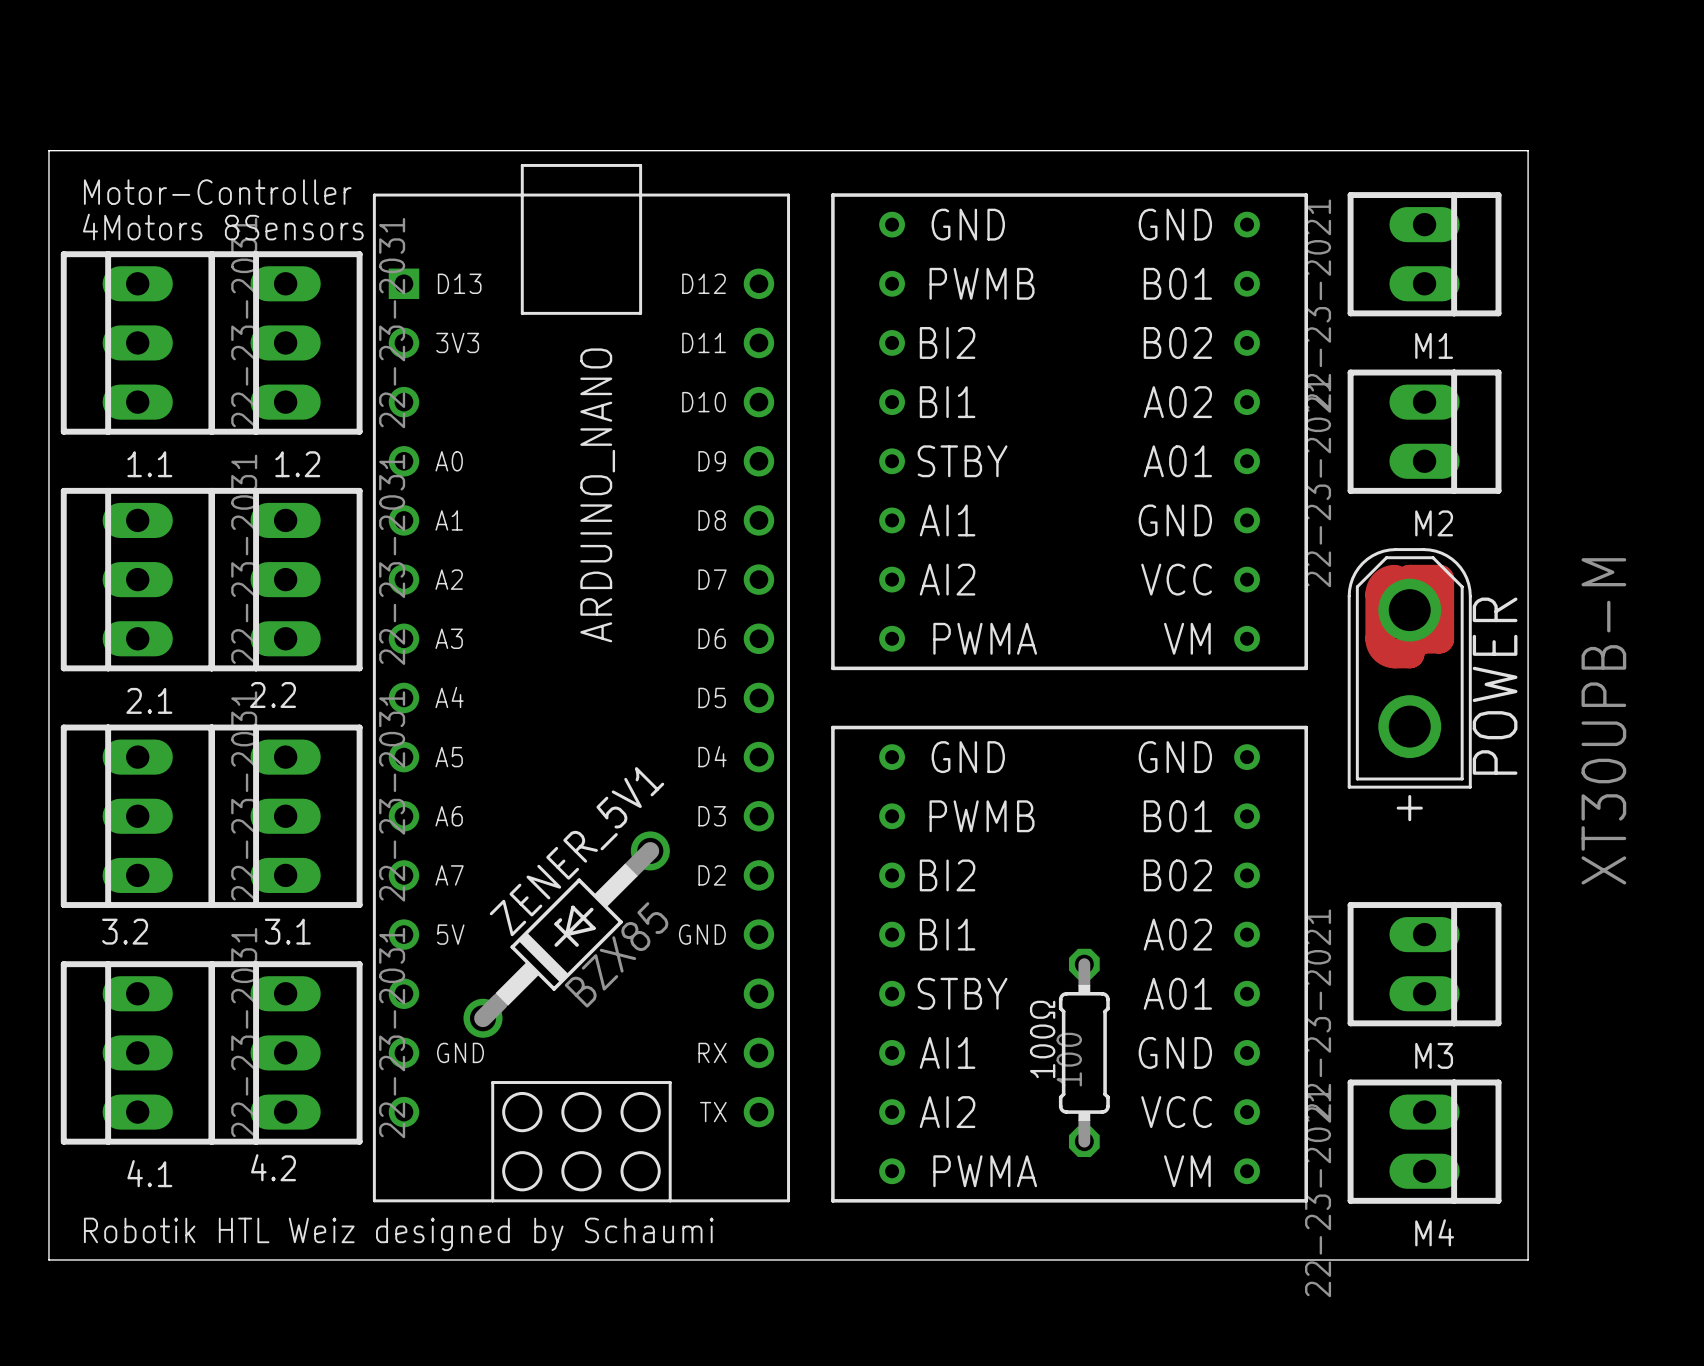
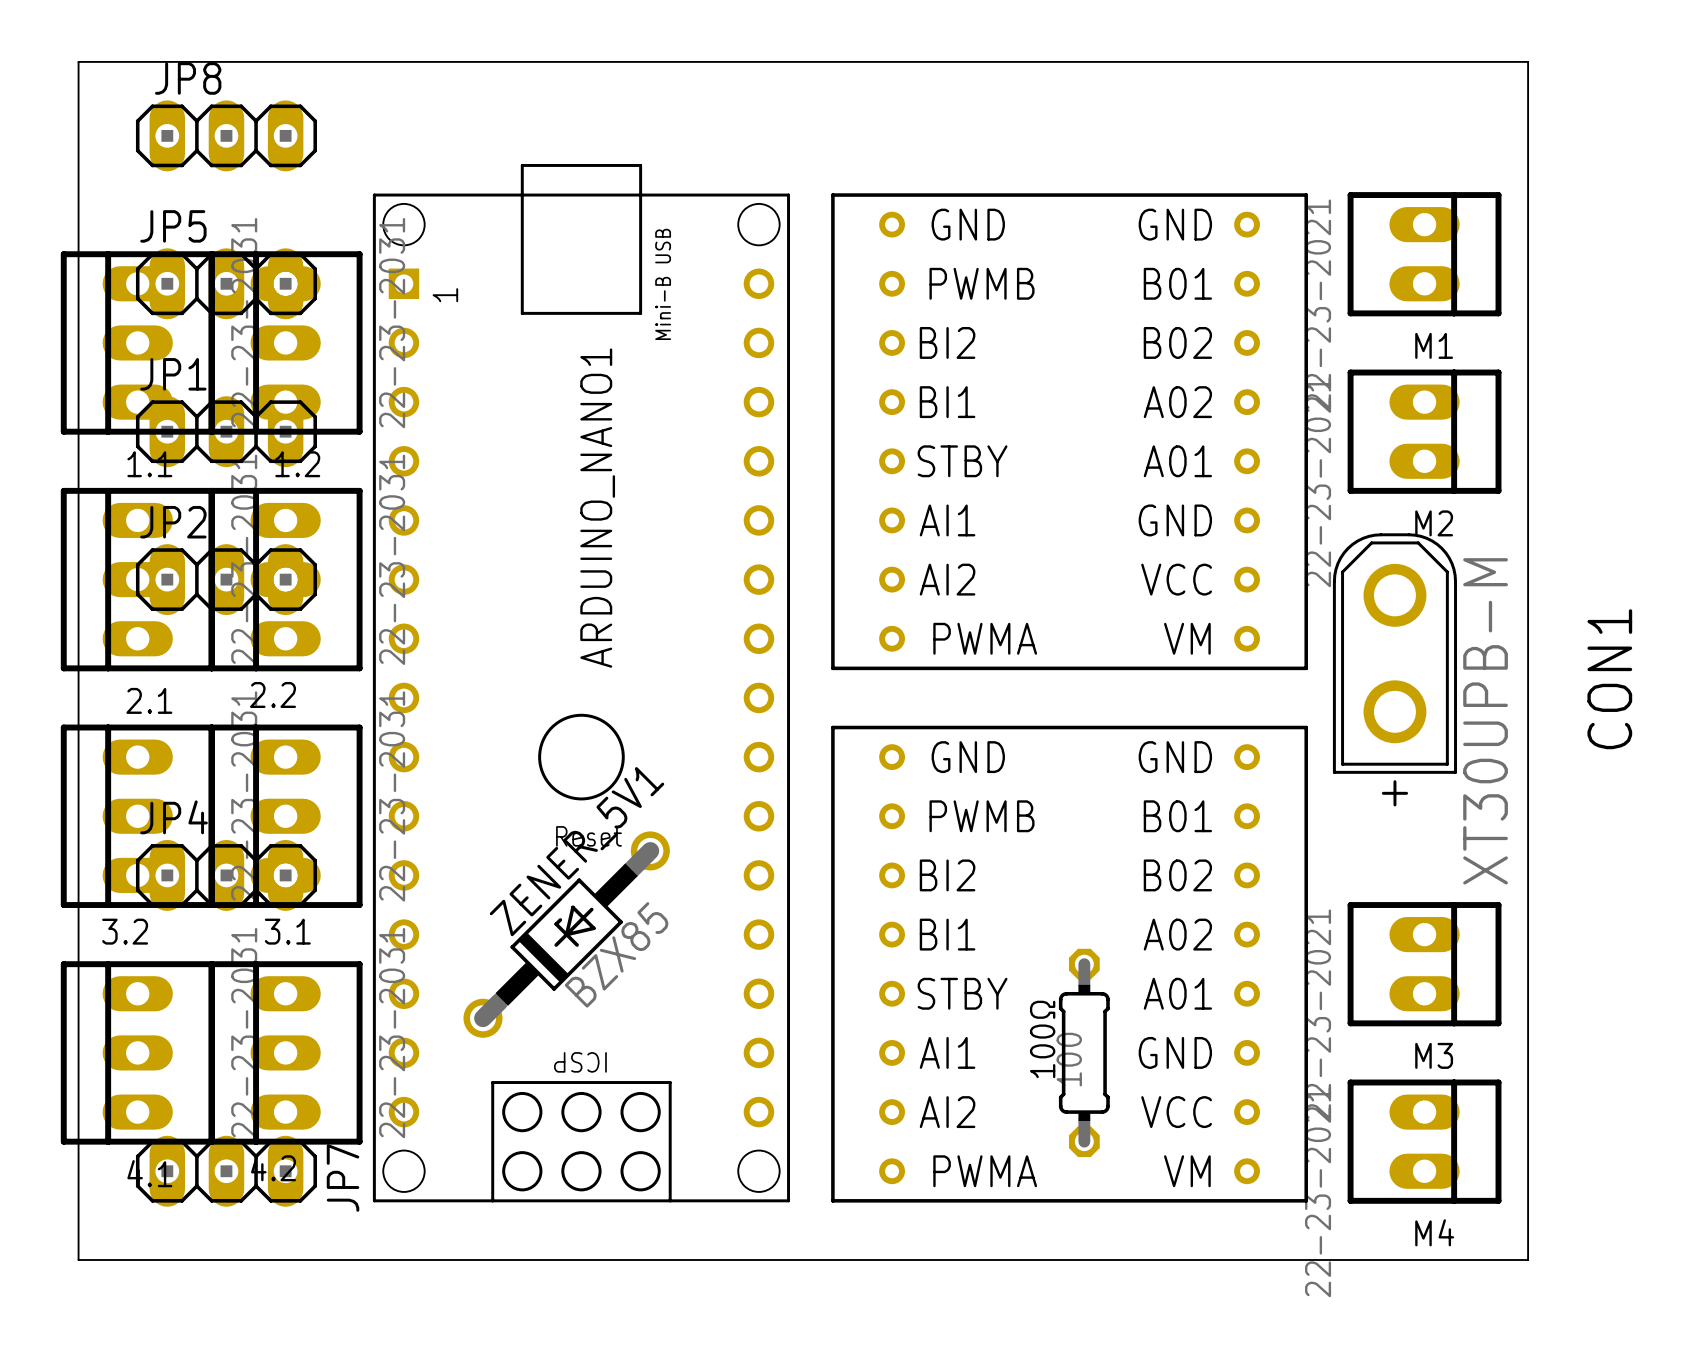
JP8: none -> (226, 135)
board edge: (1528, 150) (48, 150) (48, 1260) (78, 1260) -> (1528, 150) (1528, 61) (78, 61) (78, 1260)
text: Motor-Controller (217, 192) -> none
text: 4Motors 8Sensors (223, 227) -> none
JP5: none -> (226, 283)
JP1: none -> (226, 431)
JP2: none -> (226, 579)
track: (1394, 579) (1385, 582) (1380, 592) (1380, 640) (1387, 651) (1409, 653) (1411, 646) (1417, 640) (1439, 638) (1439, 579) (1409, 579) (1409, 610) -> none
ARDUINO_NANO: (581, 683) -> none
ARDUINO_NANO1: none -> (581, 683)
POWER position: (1409, 684) -> (1394, 669)
POWER name: POWER (1495, 686) -> CON1 (1609, 679)
POWER value position: XT30UPB-M (1603, 721) -> XT30UPB-M (1485, 721)
JP4: none -> (226, 875)
JP7: none -> (226, 1171)
text: Robotik HTL Weiz designed by Schaumi (398, 1234) -> none

